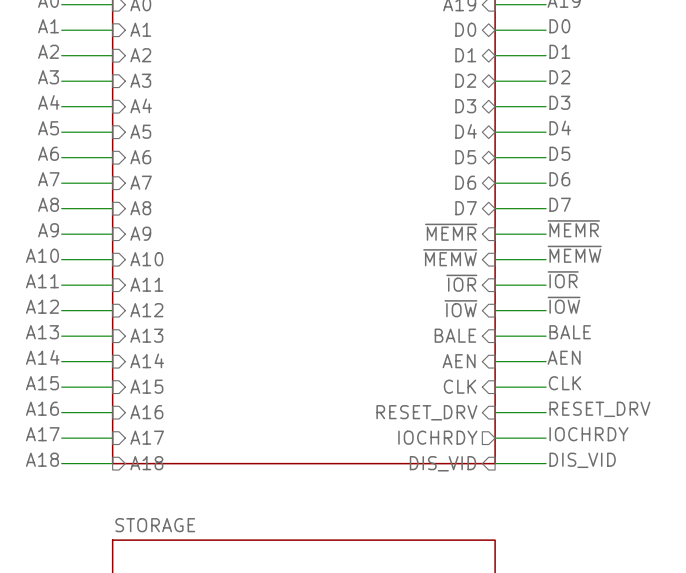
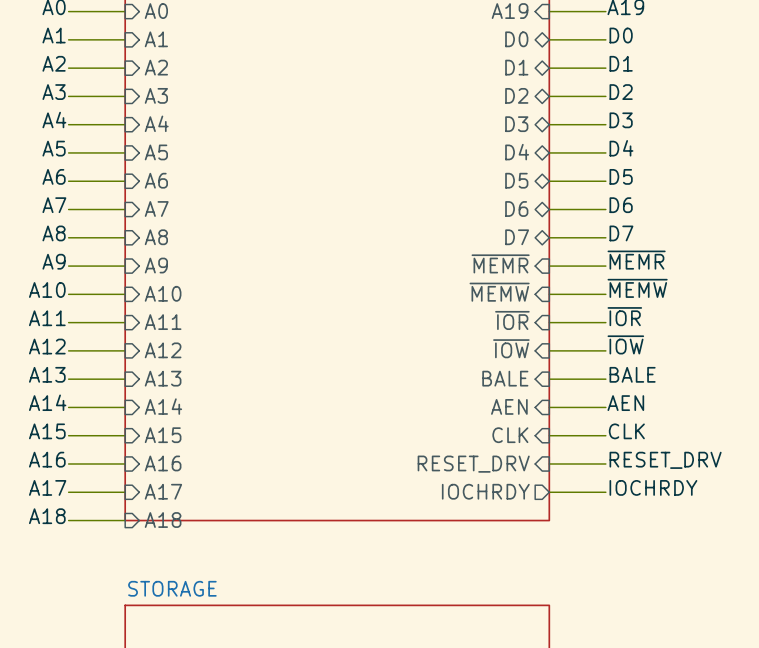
label: DIS_VID (582, 460) -> none
sheet pin: DIS_VID (442, 463) -> none
wire: (495, 463) (546, 463) -> none

